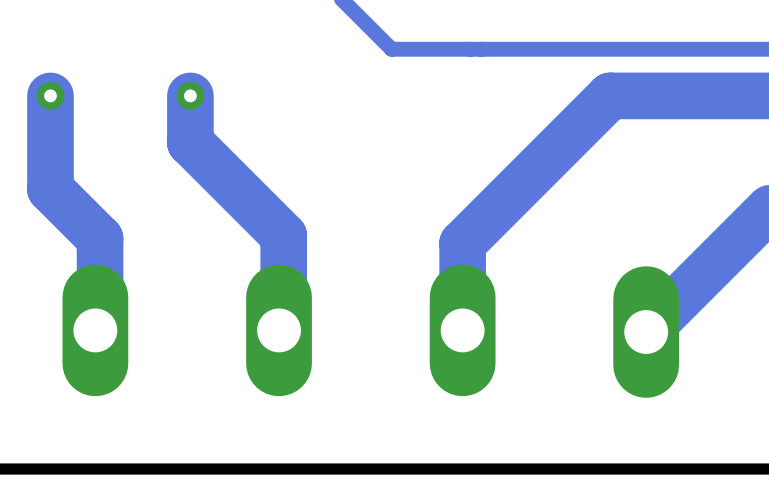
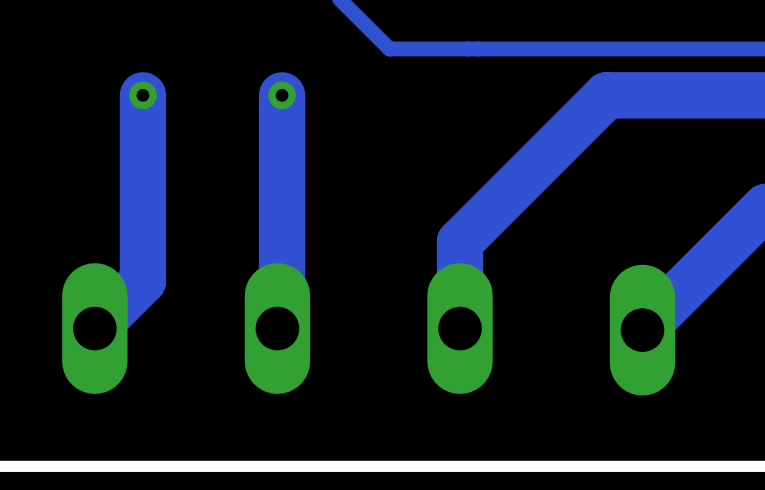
track: (50, 95) (50, 189) (100, 238) (100, 325) (95, 330) -> (142, 95) (142, 280) (95, 328)
via: (50, 95) -> none
via: none -> (142, 95)
track: (190, 95) (190, 142) (283, 235) -> (282, 95) (282, 234)
via: (190, 95) -> none
via: none -> (282, 95)

